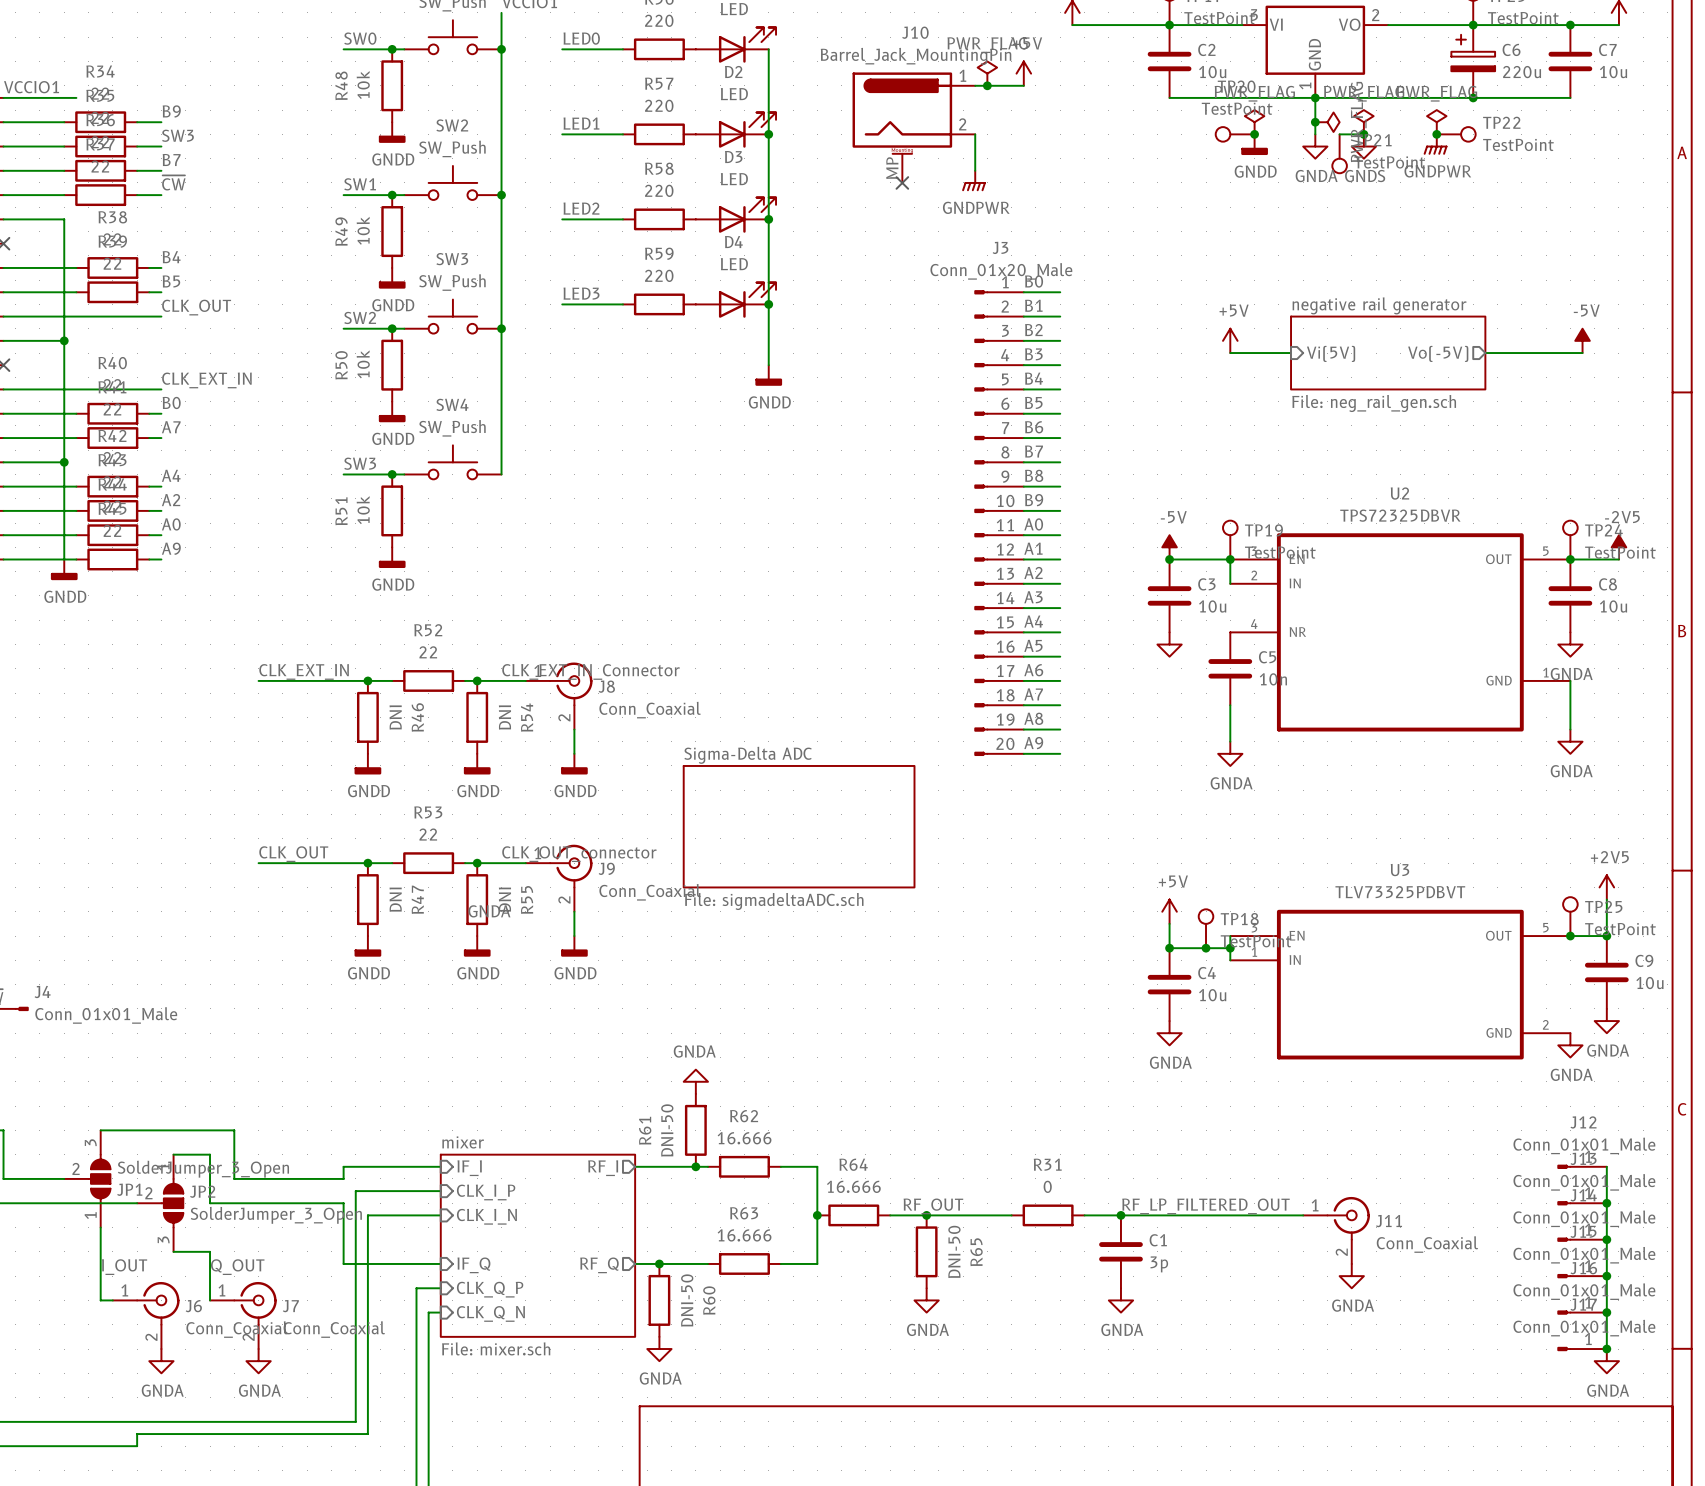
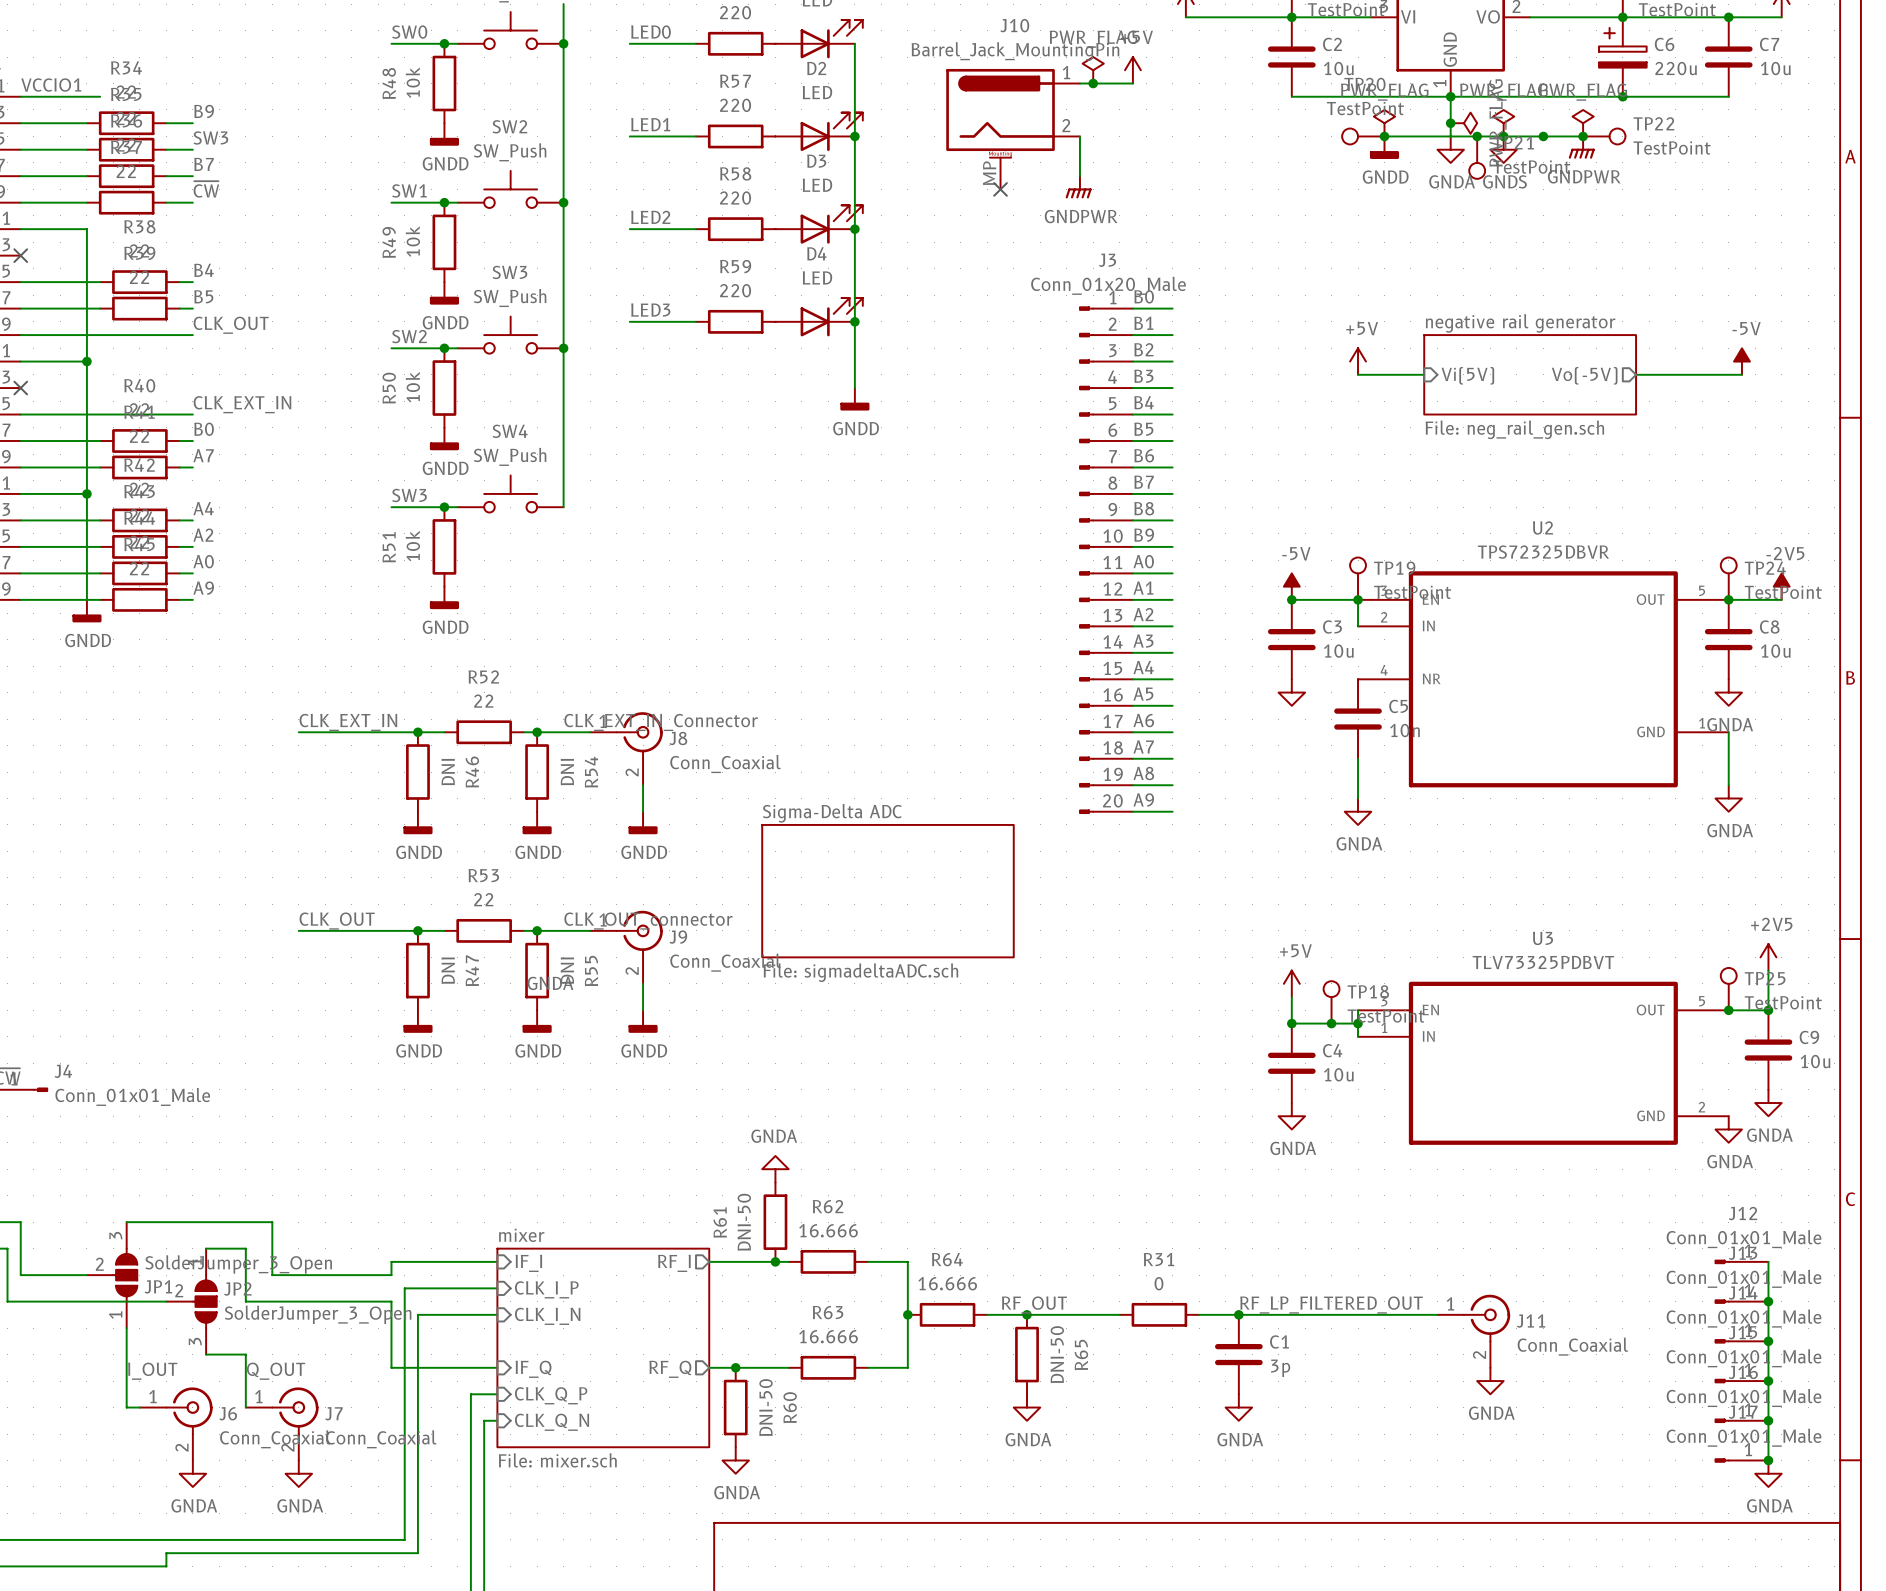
wire: none -> (1384, 136) (1477, 136)
junction: none -> (1477, 136)
wire: none -> (1503, 136) (1583, 136)
junction: none -> (1543, 136)

